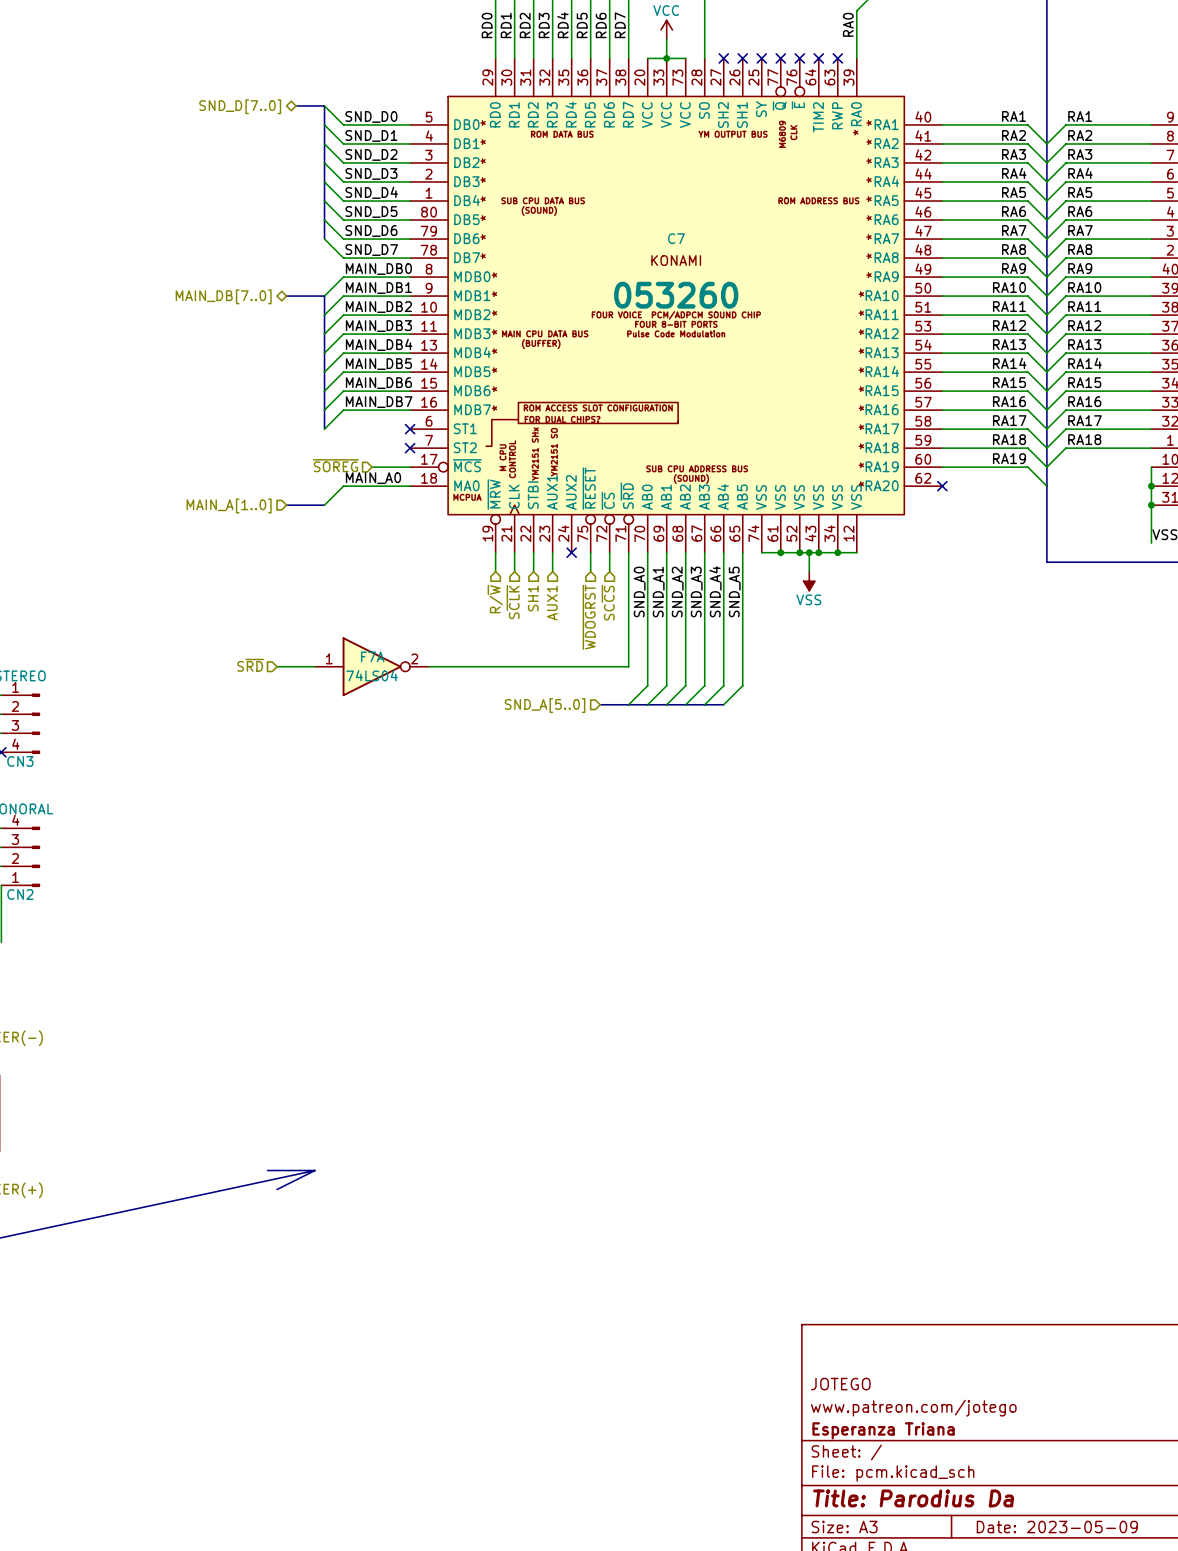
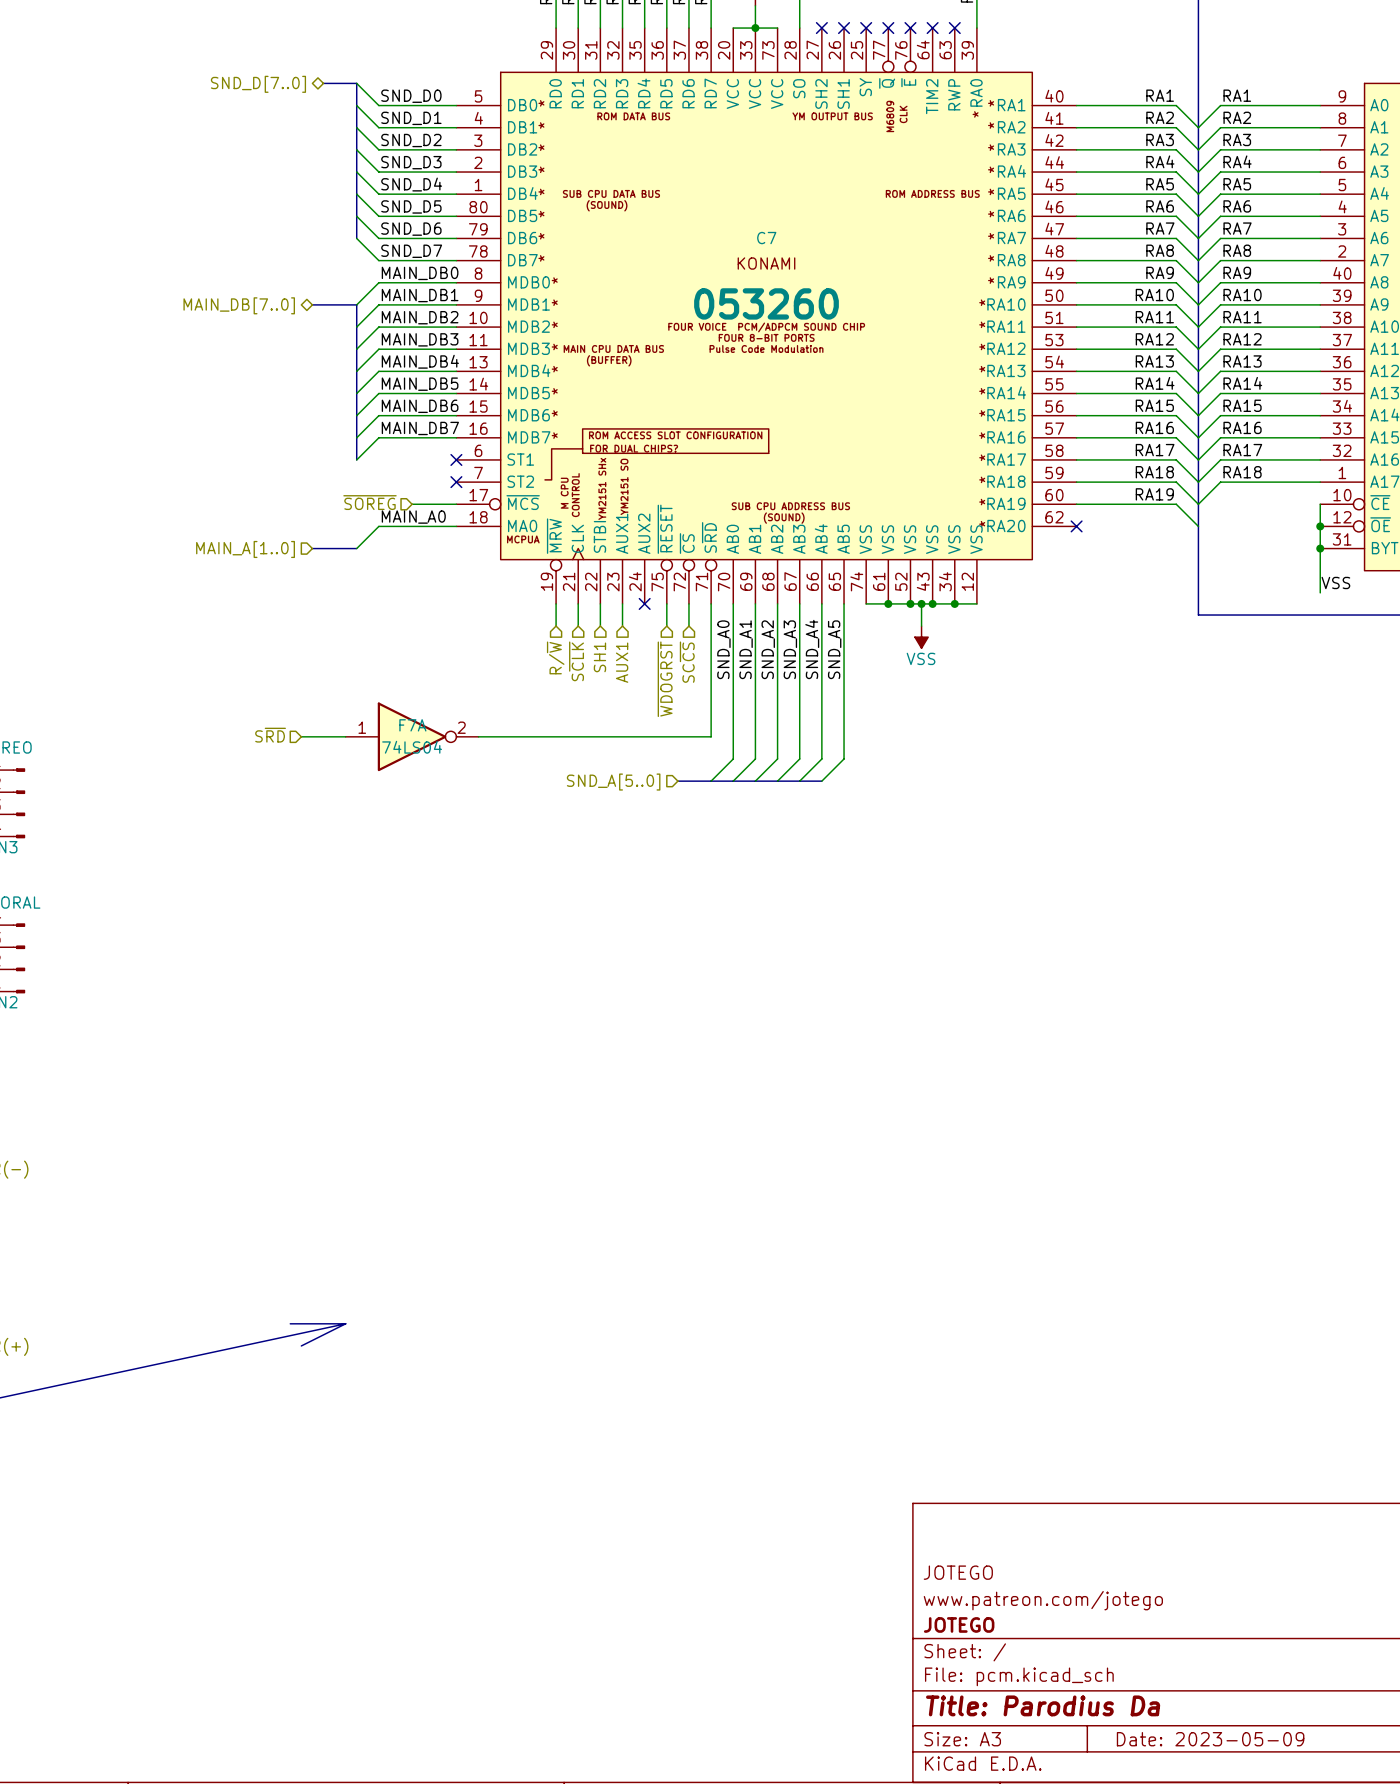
title block: Esperanza Triana (883, 1430) -> JOTEGO (959, 1624)

